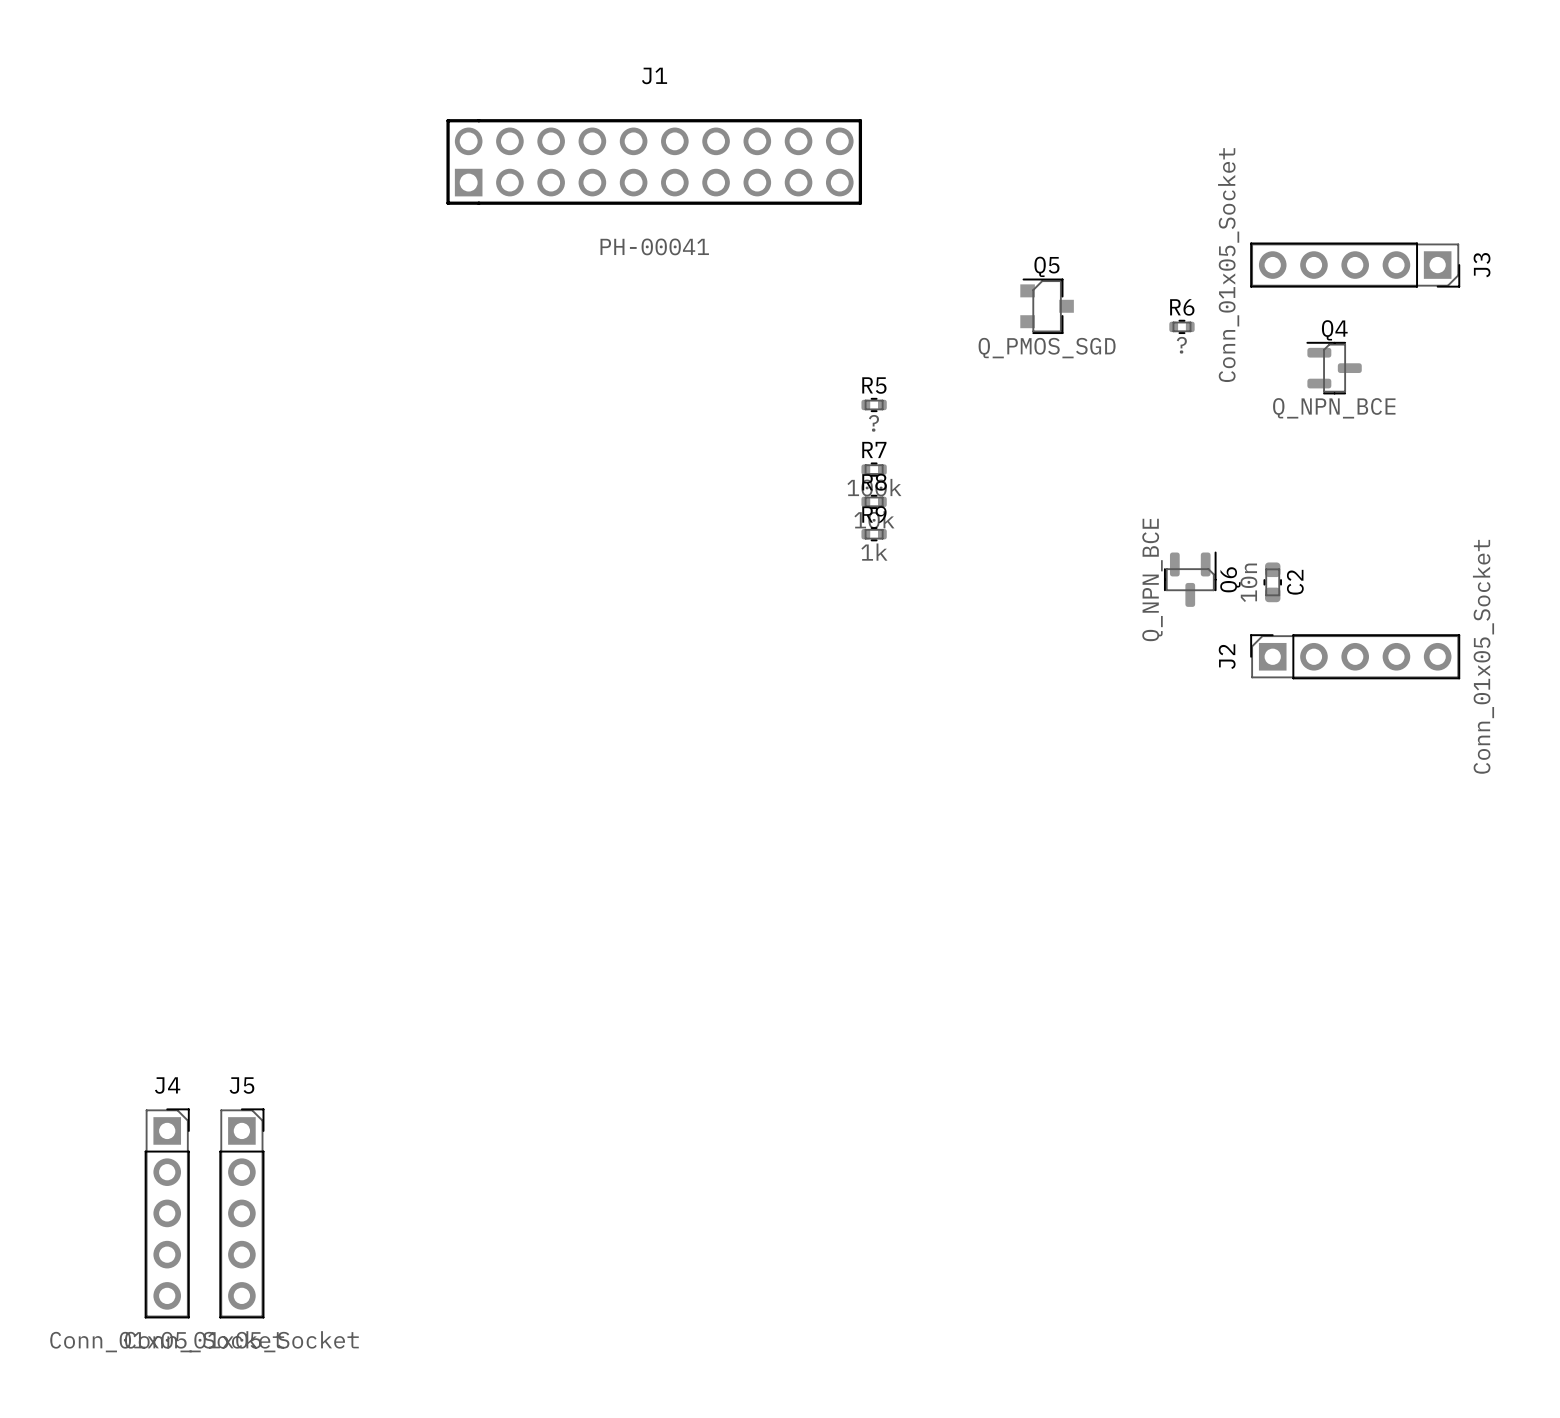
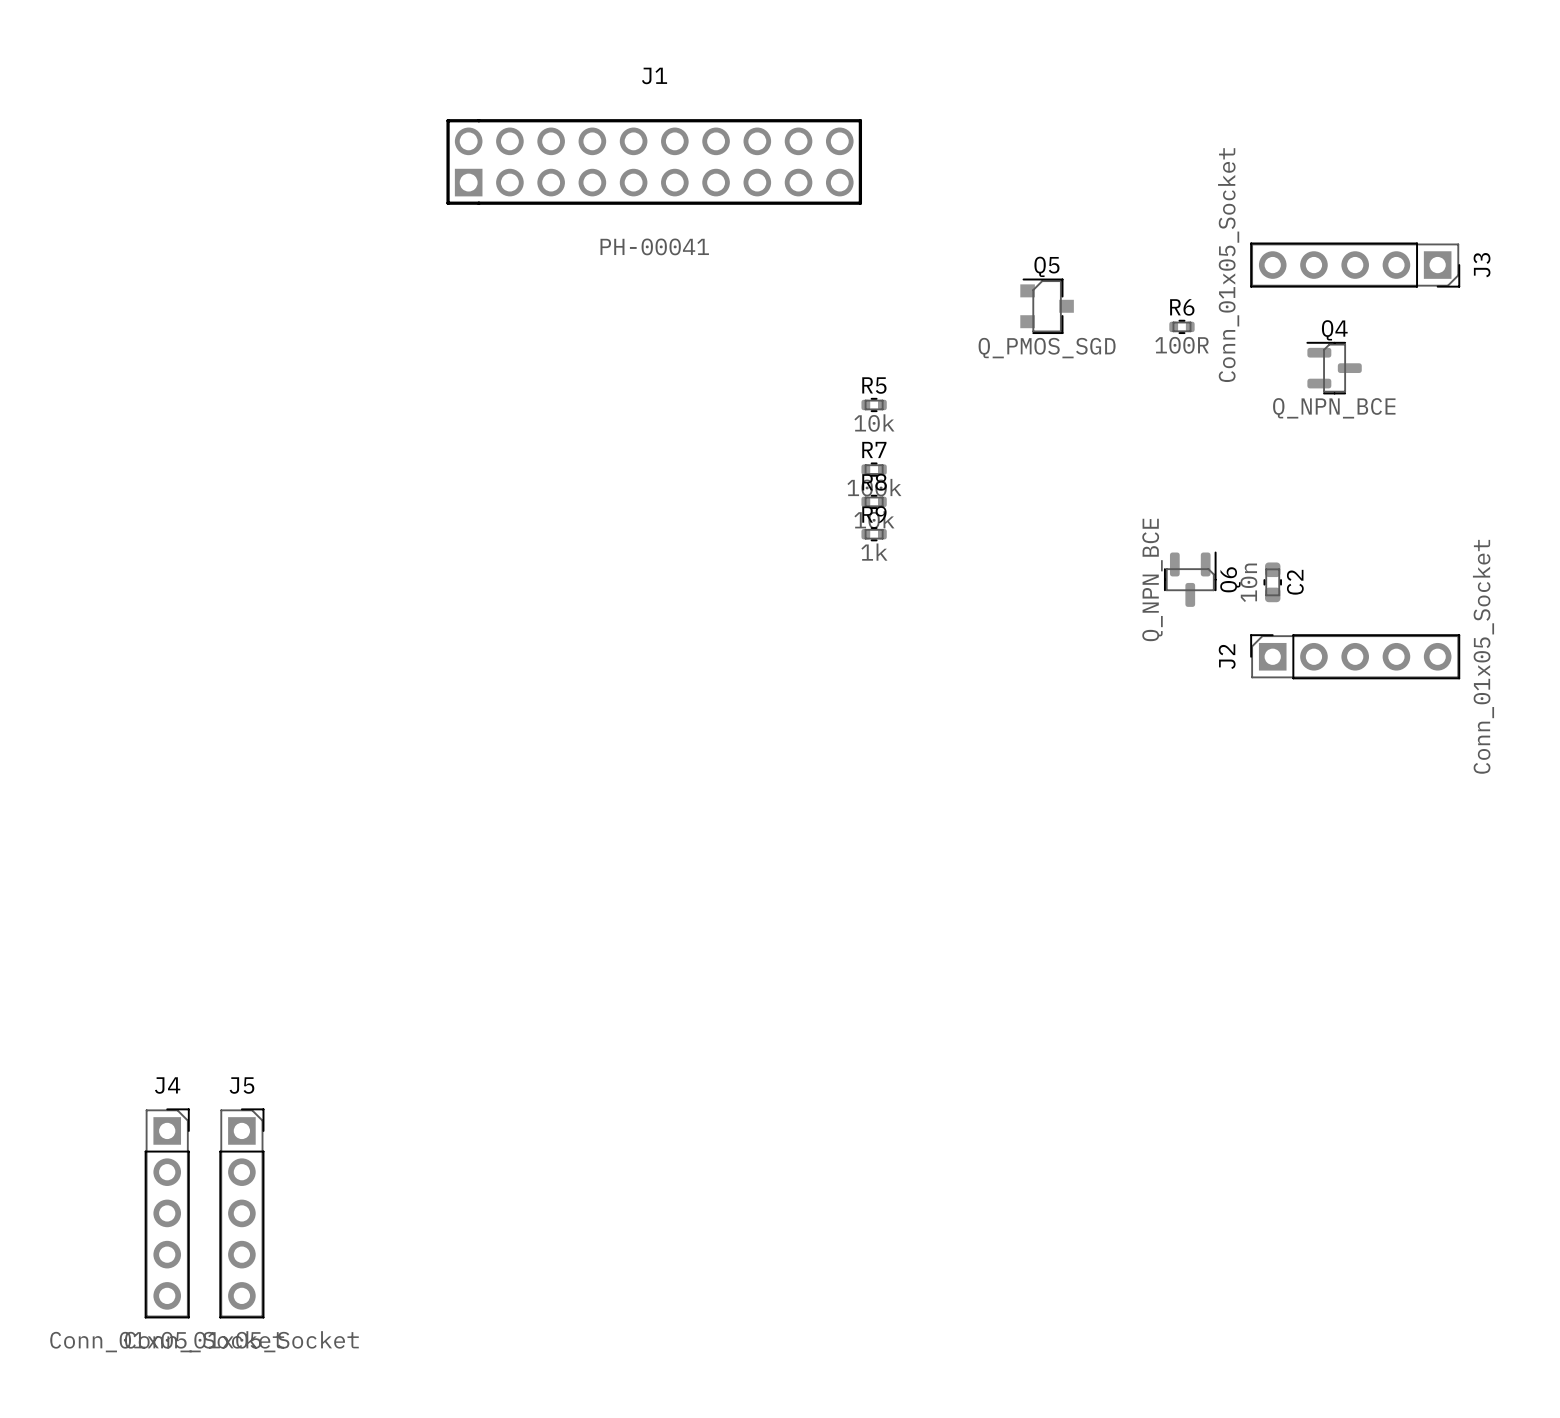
R6 value: ? (1181, 345) -> 100R (1182, 345)
R5 value: ? (873, 423) -> 10k (874, 423)

